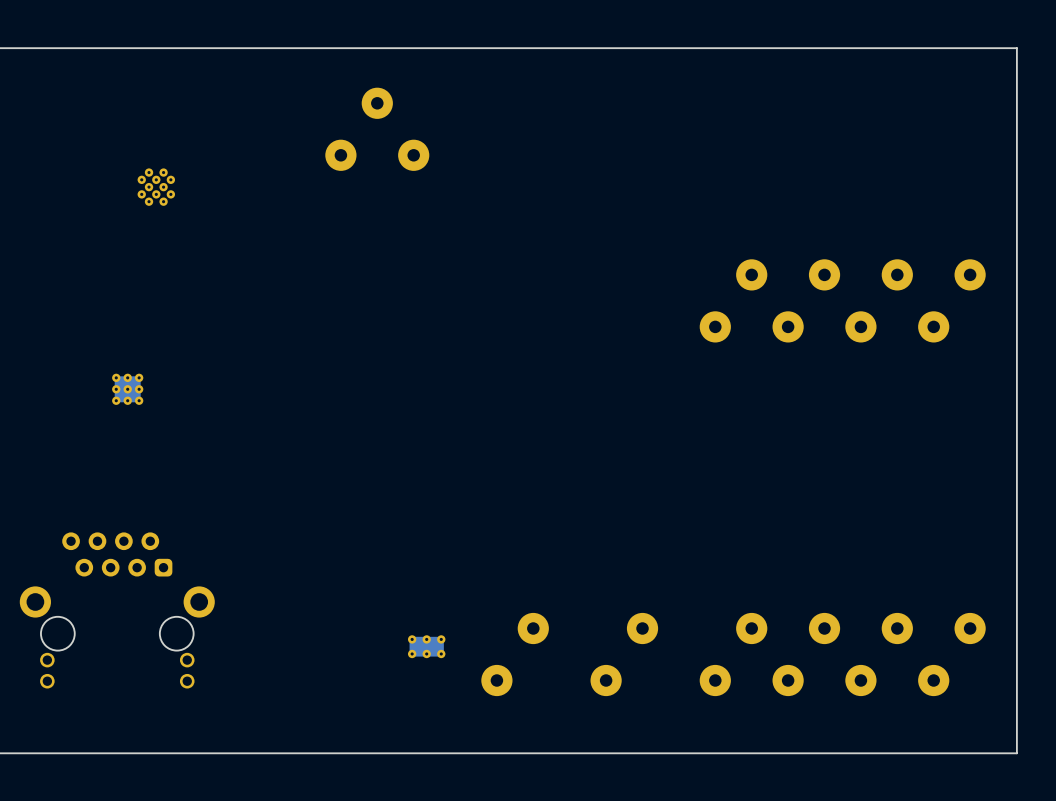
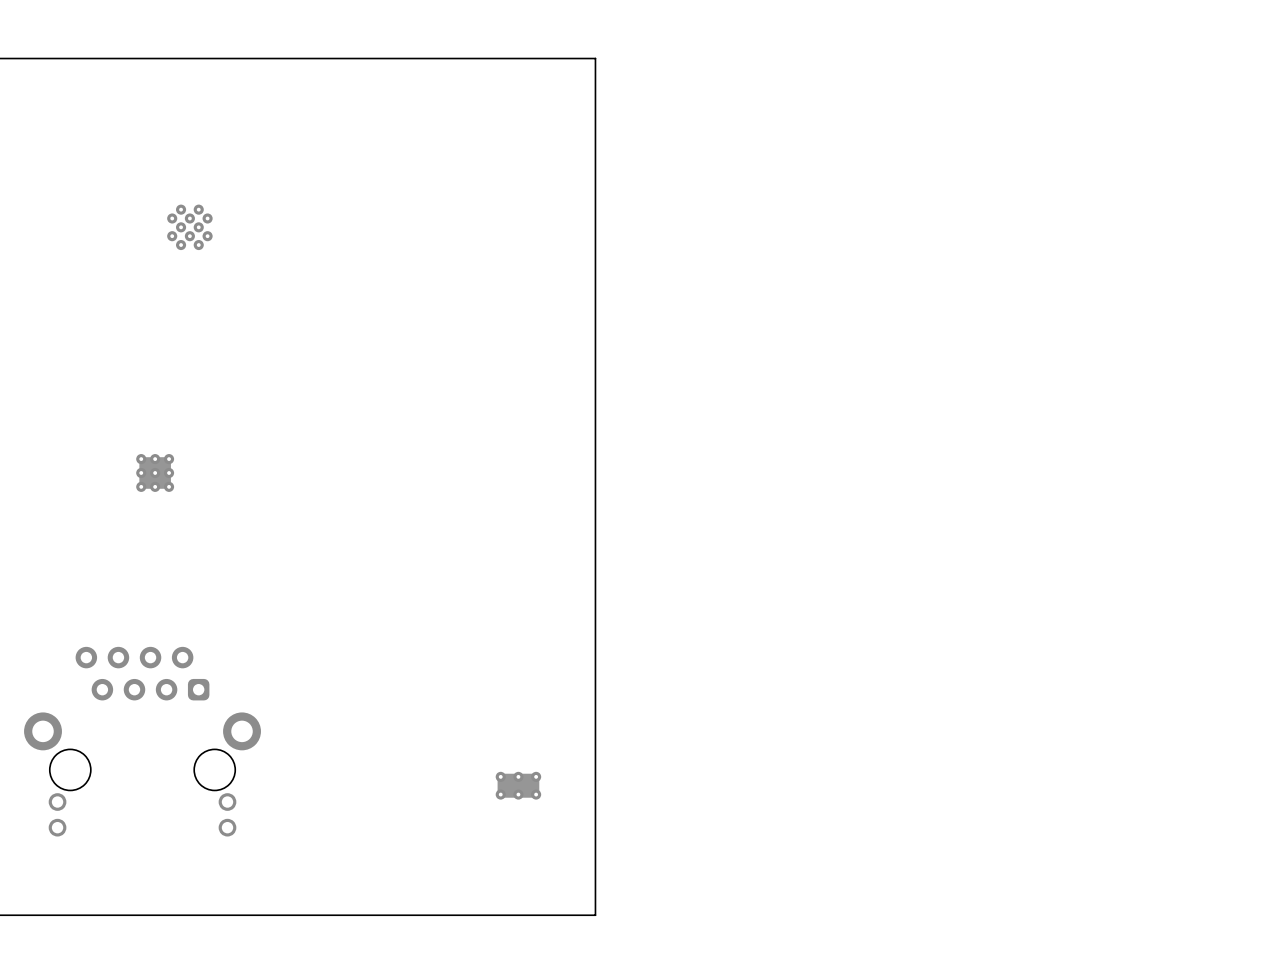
board edge: (490, 48) (1016, 48) (1016, 753) (490, 753) -> (595, 58) (595, 915)
part: (377, 129) -> none
part: (842, 300) -> none
part: (515, 654) -> none
part: (624, 654) -> none
part: (842, 654) -> none

